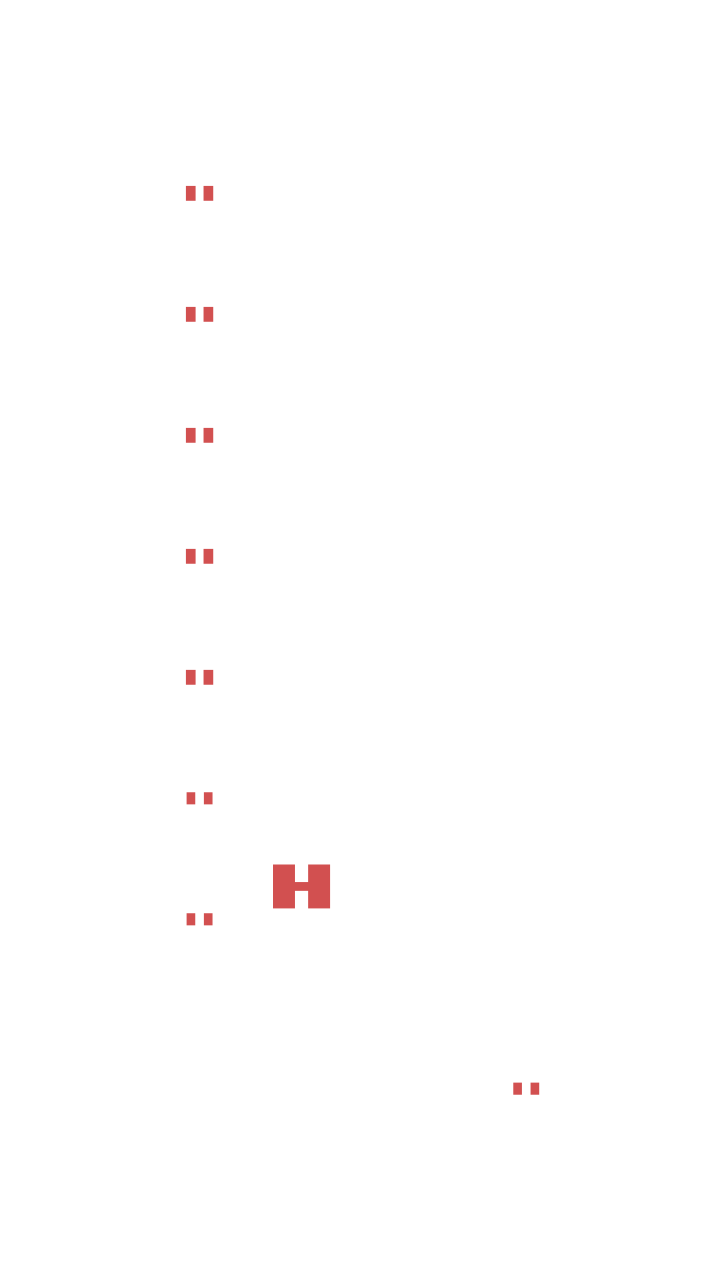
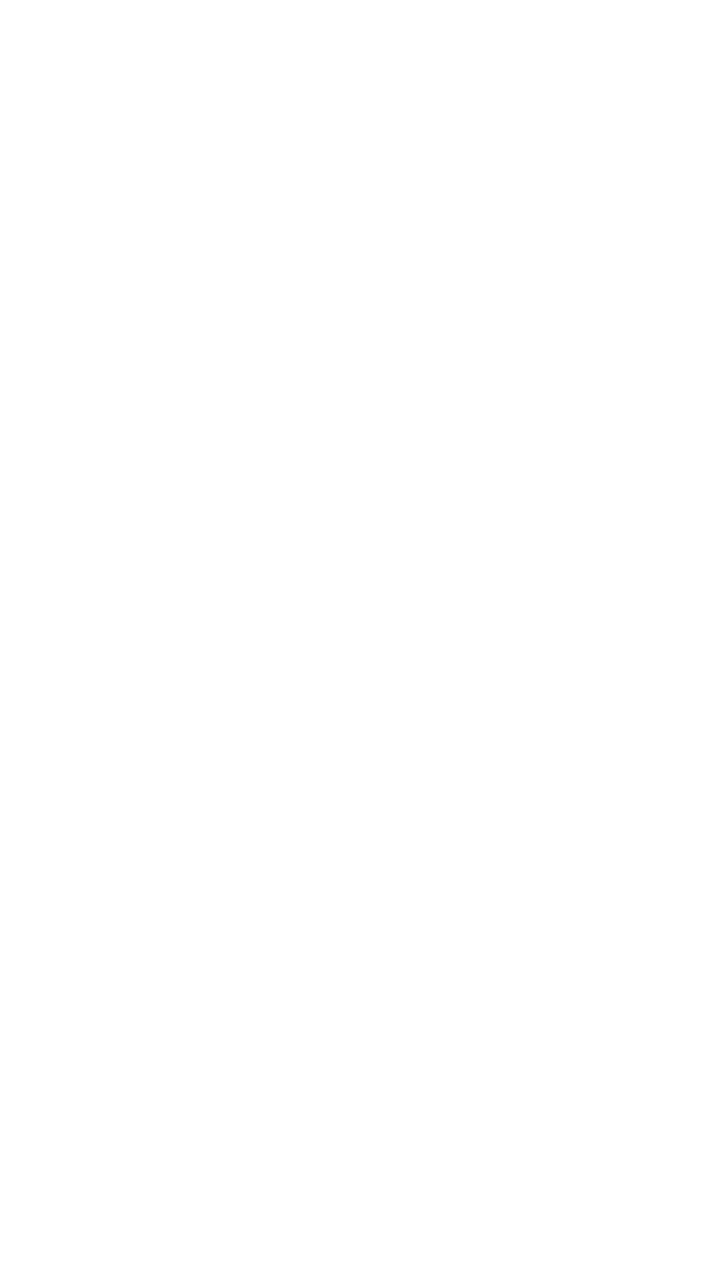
part: (199, 193) -> none
part: (199, 314) -> none
part: (199, 435) -> none
part: (199, 556) -> none
part: (199, 677) -> none
part: (199, 798) -> none
part: (301, 886) -> none
part: (199, 919) -> none
part: (526, 1088) -> none

